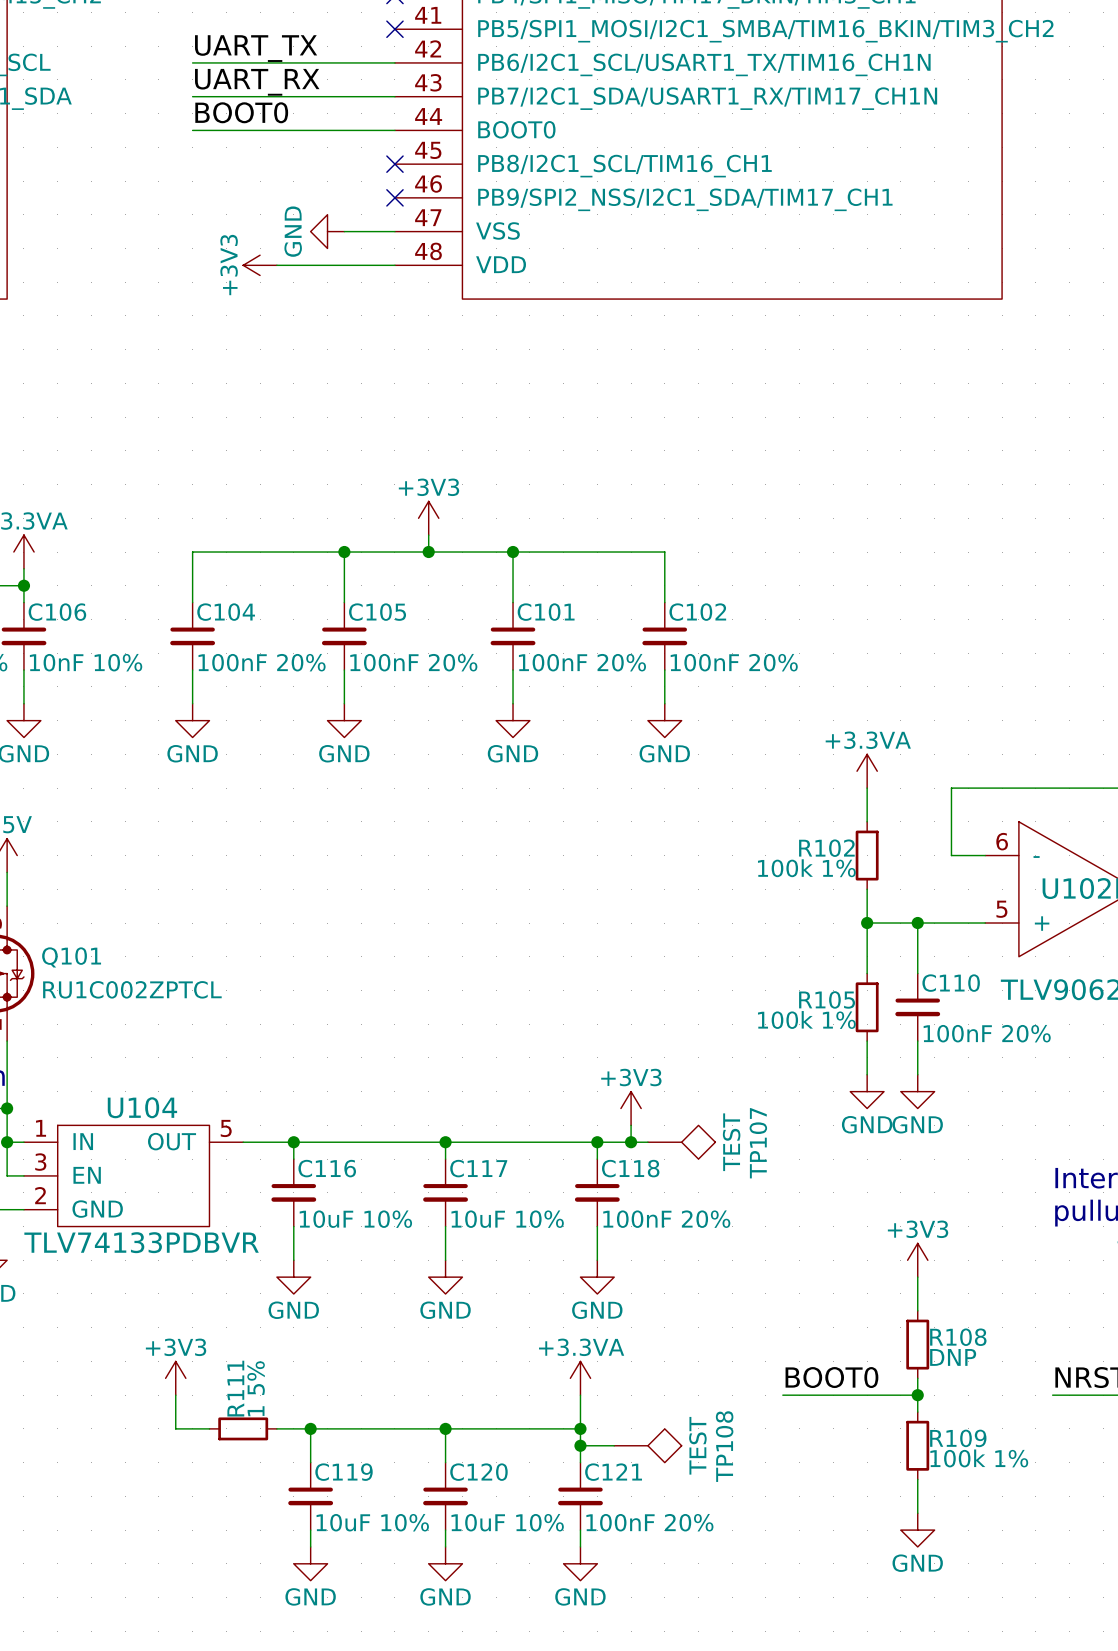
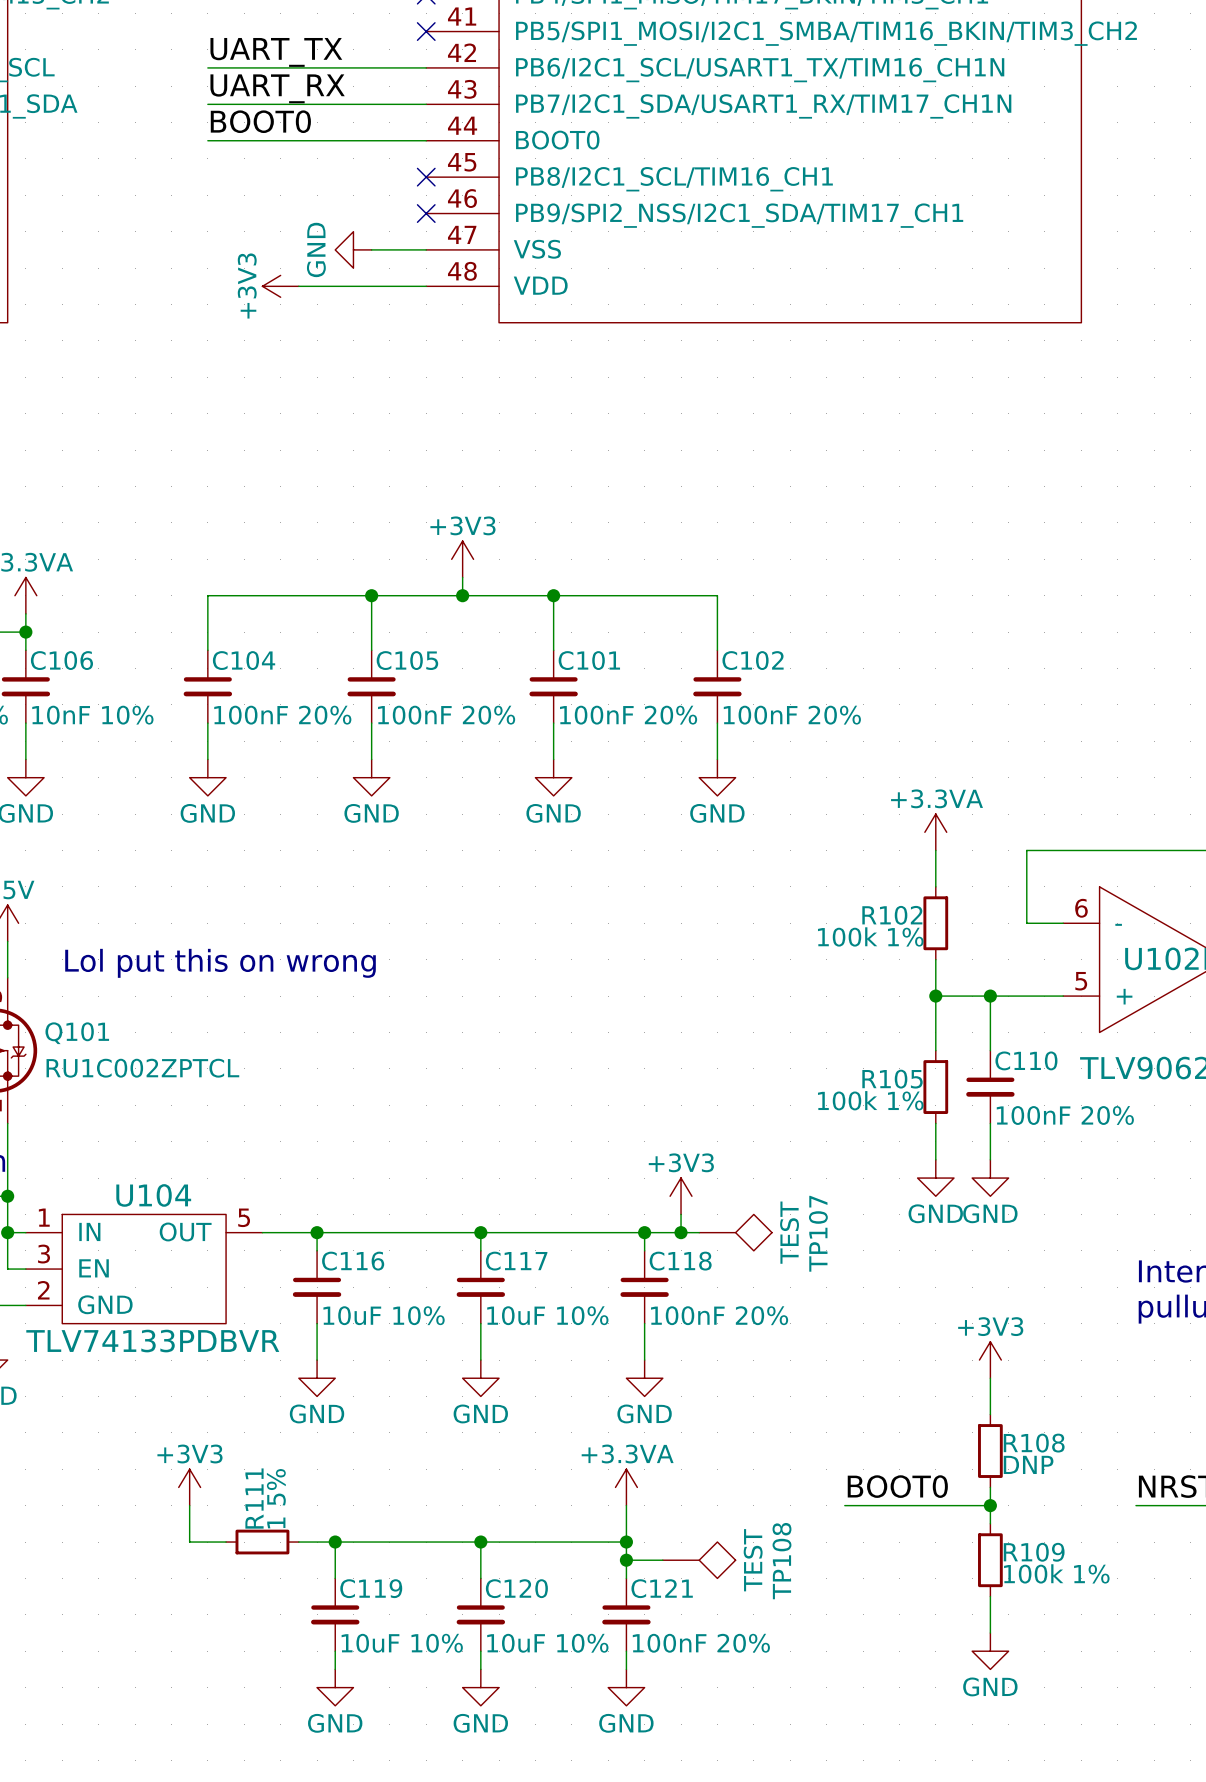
text: none -> Lol put this on wrong (220, 963)

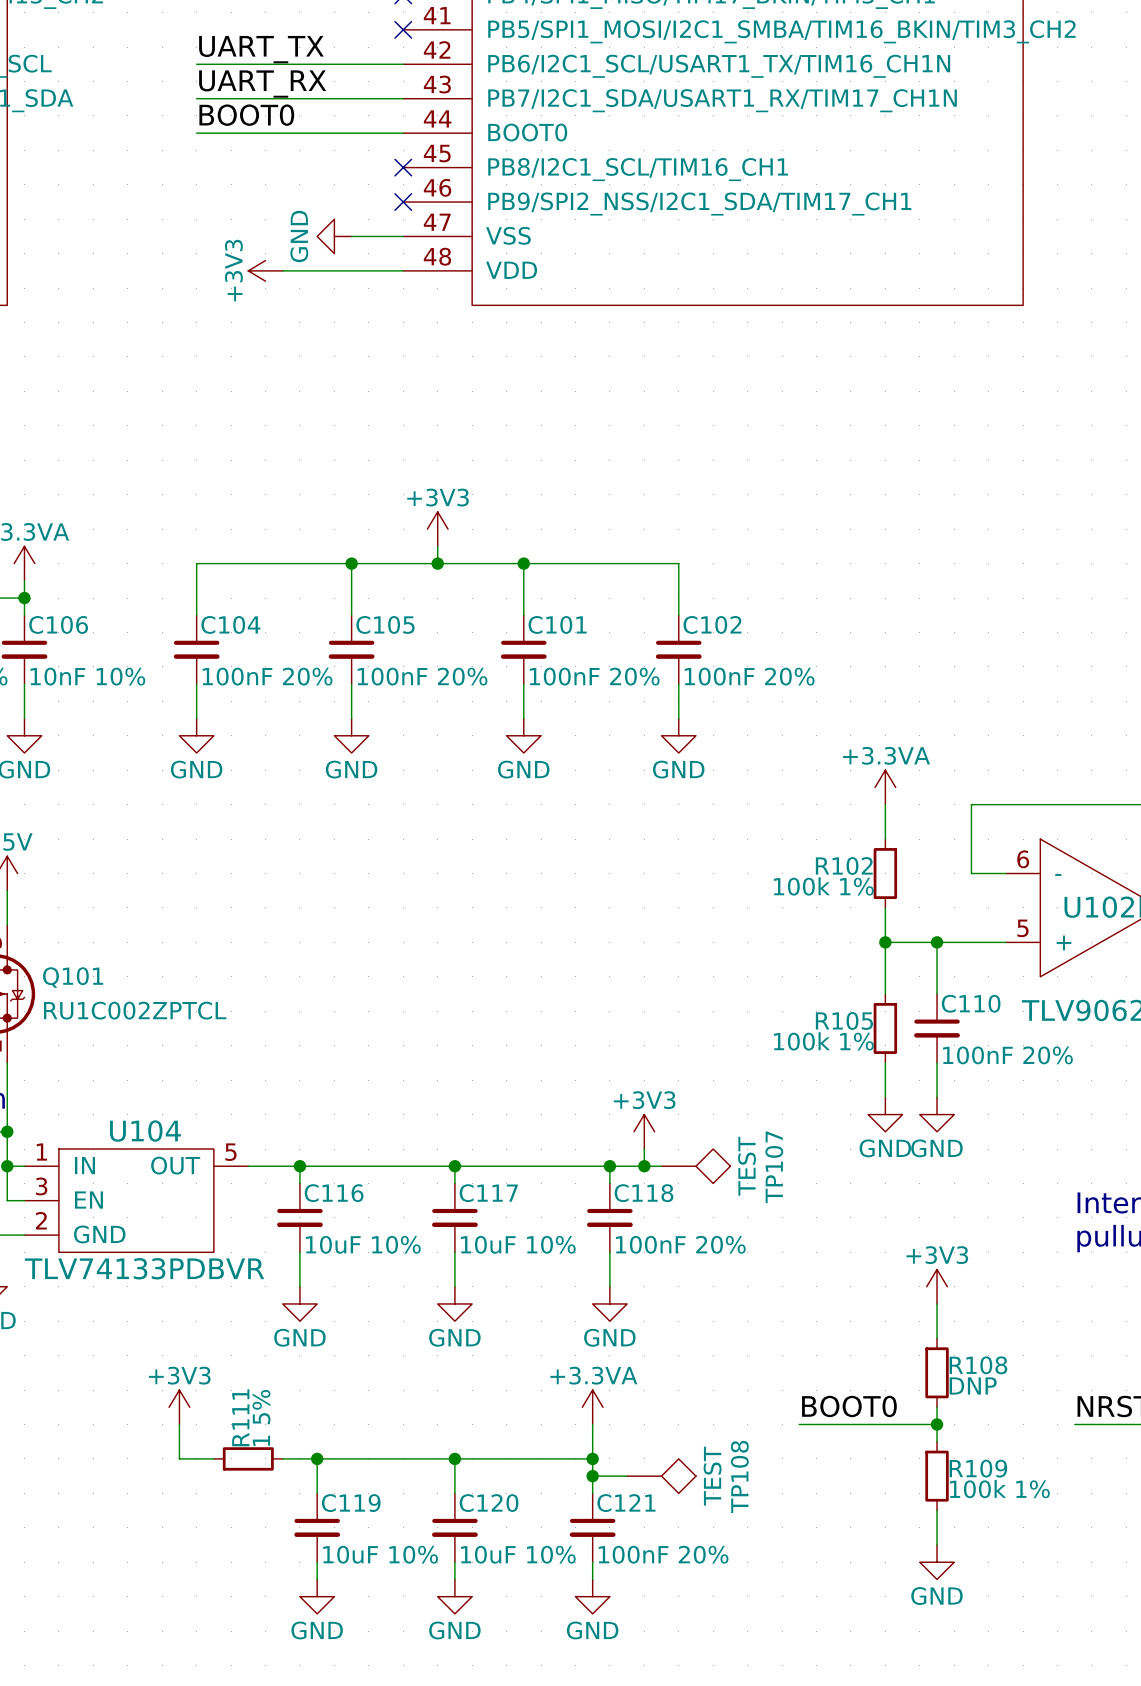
text: Lol put this on wrong (220, 963) -> none

